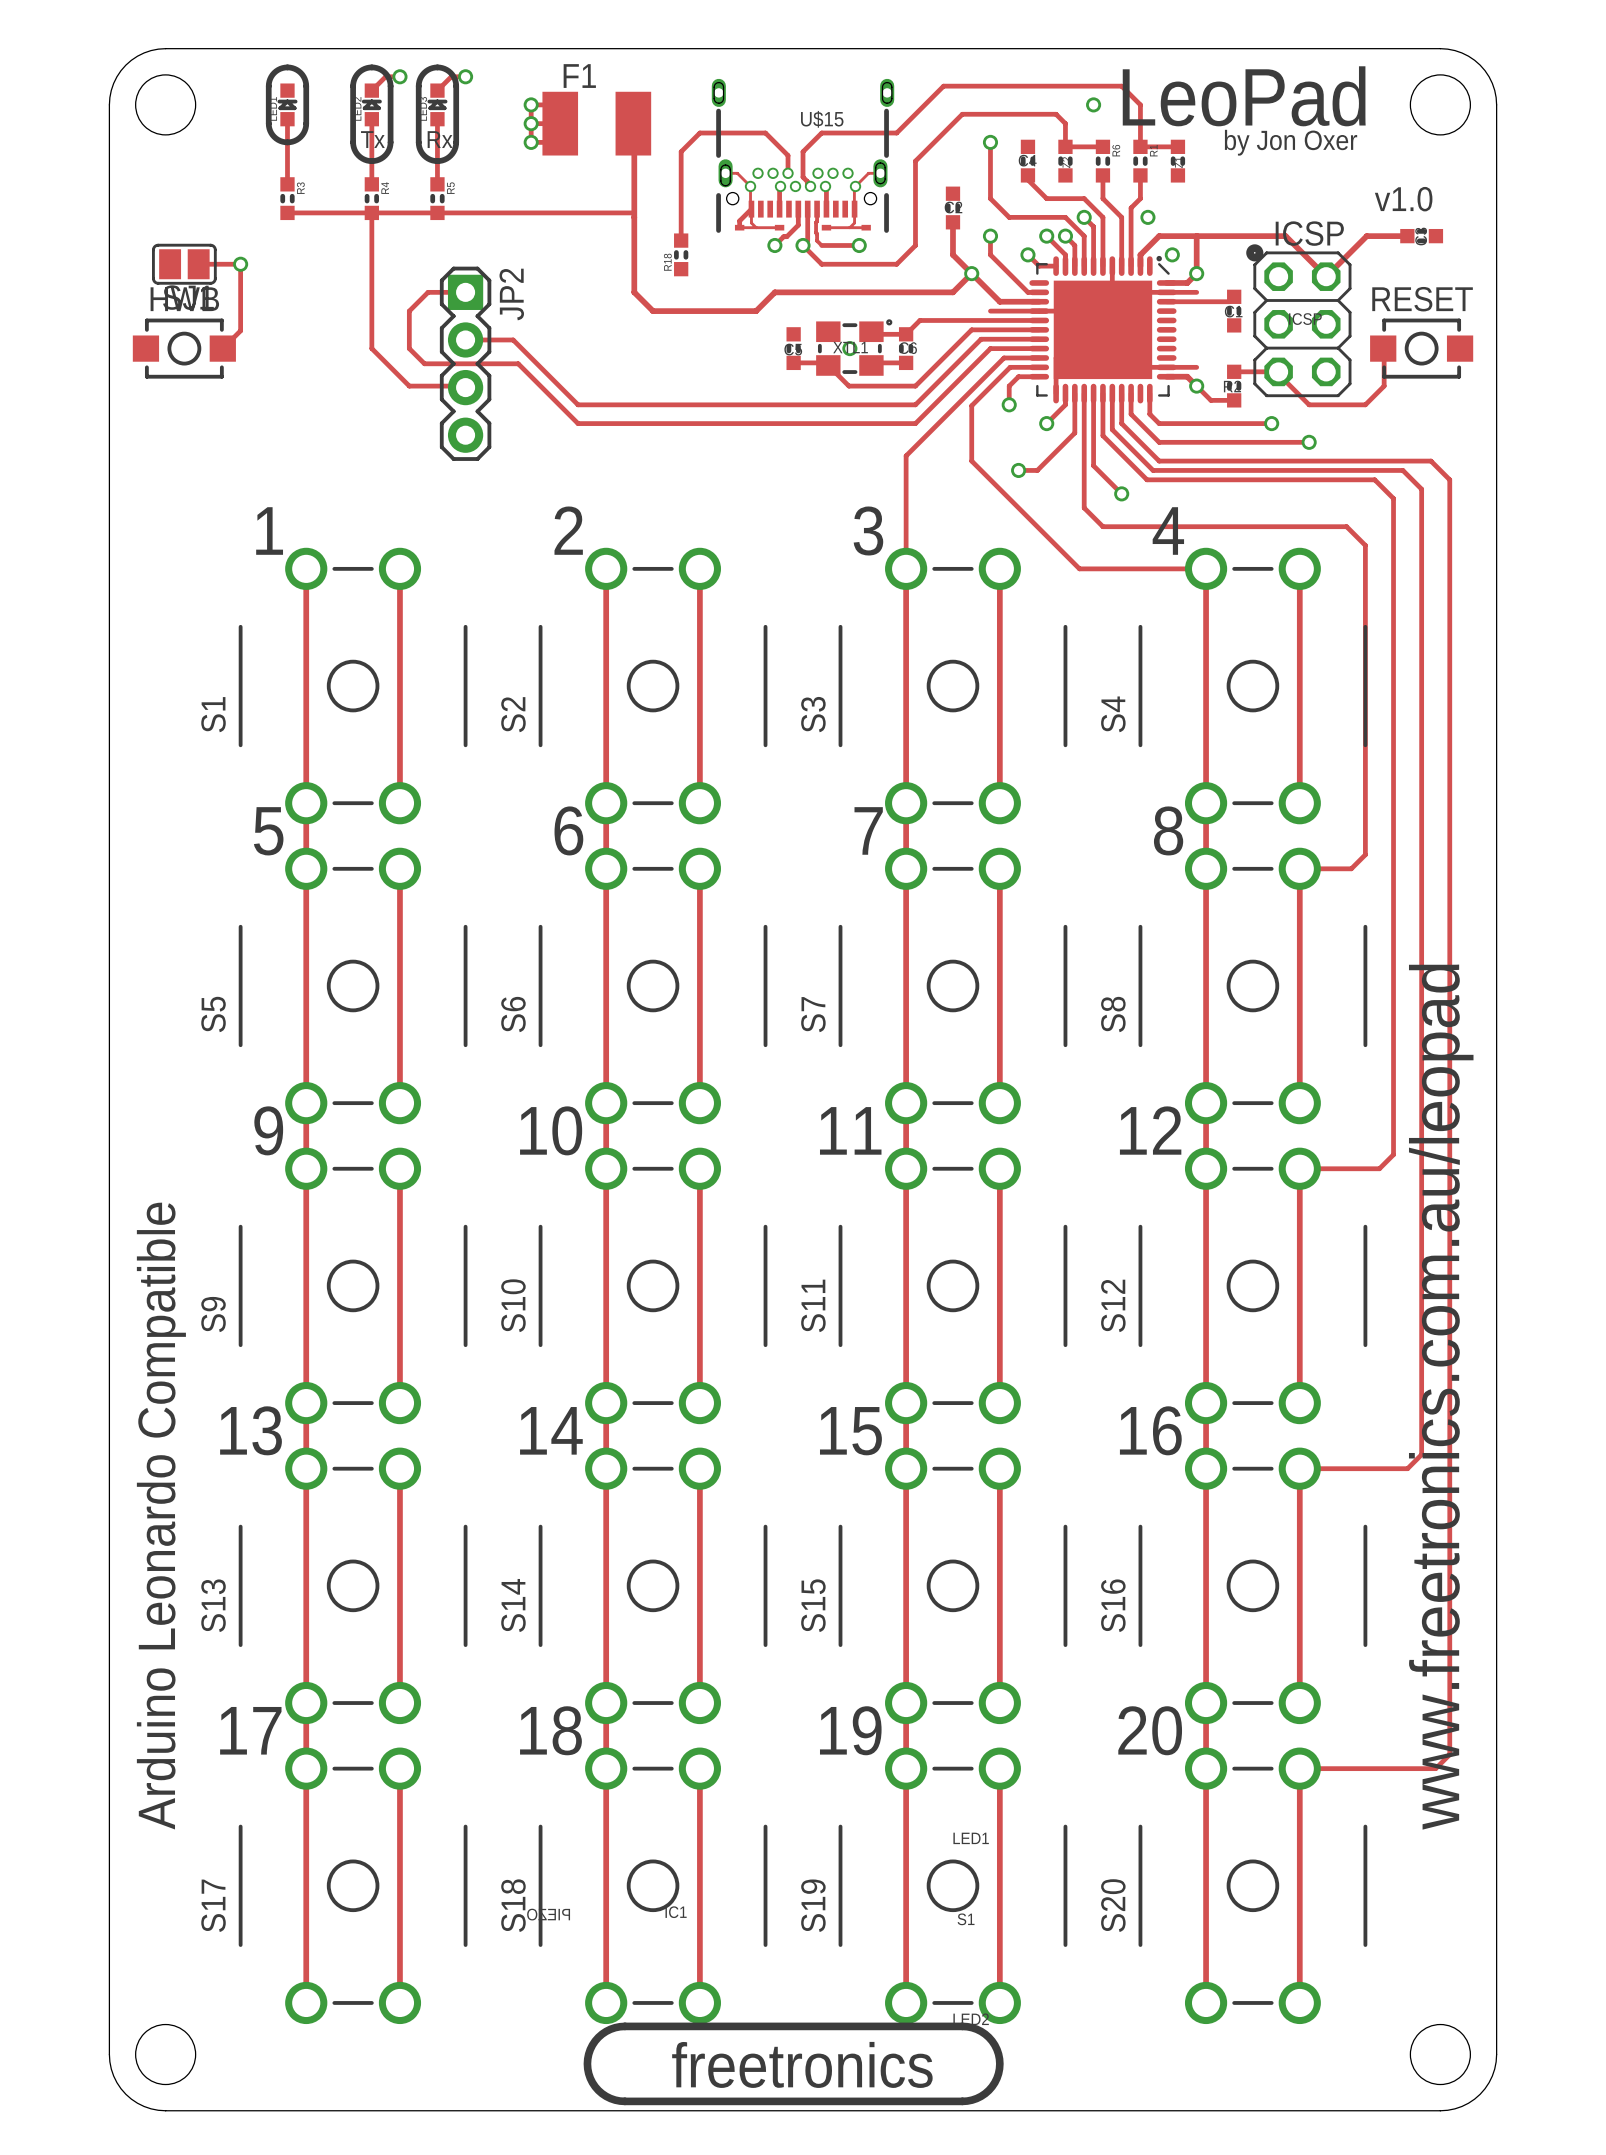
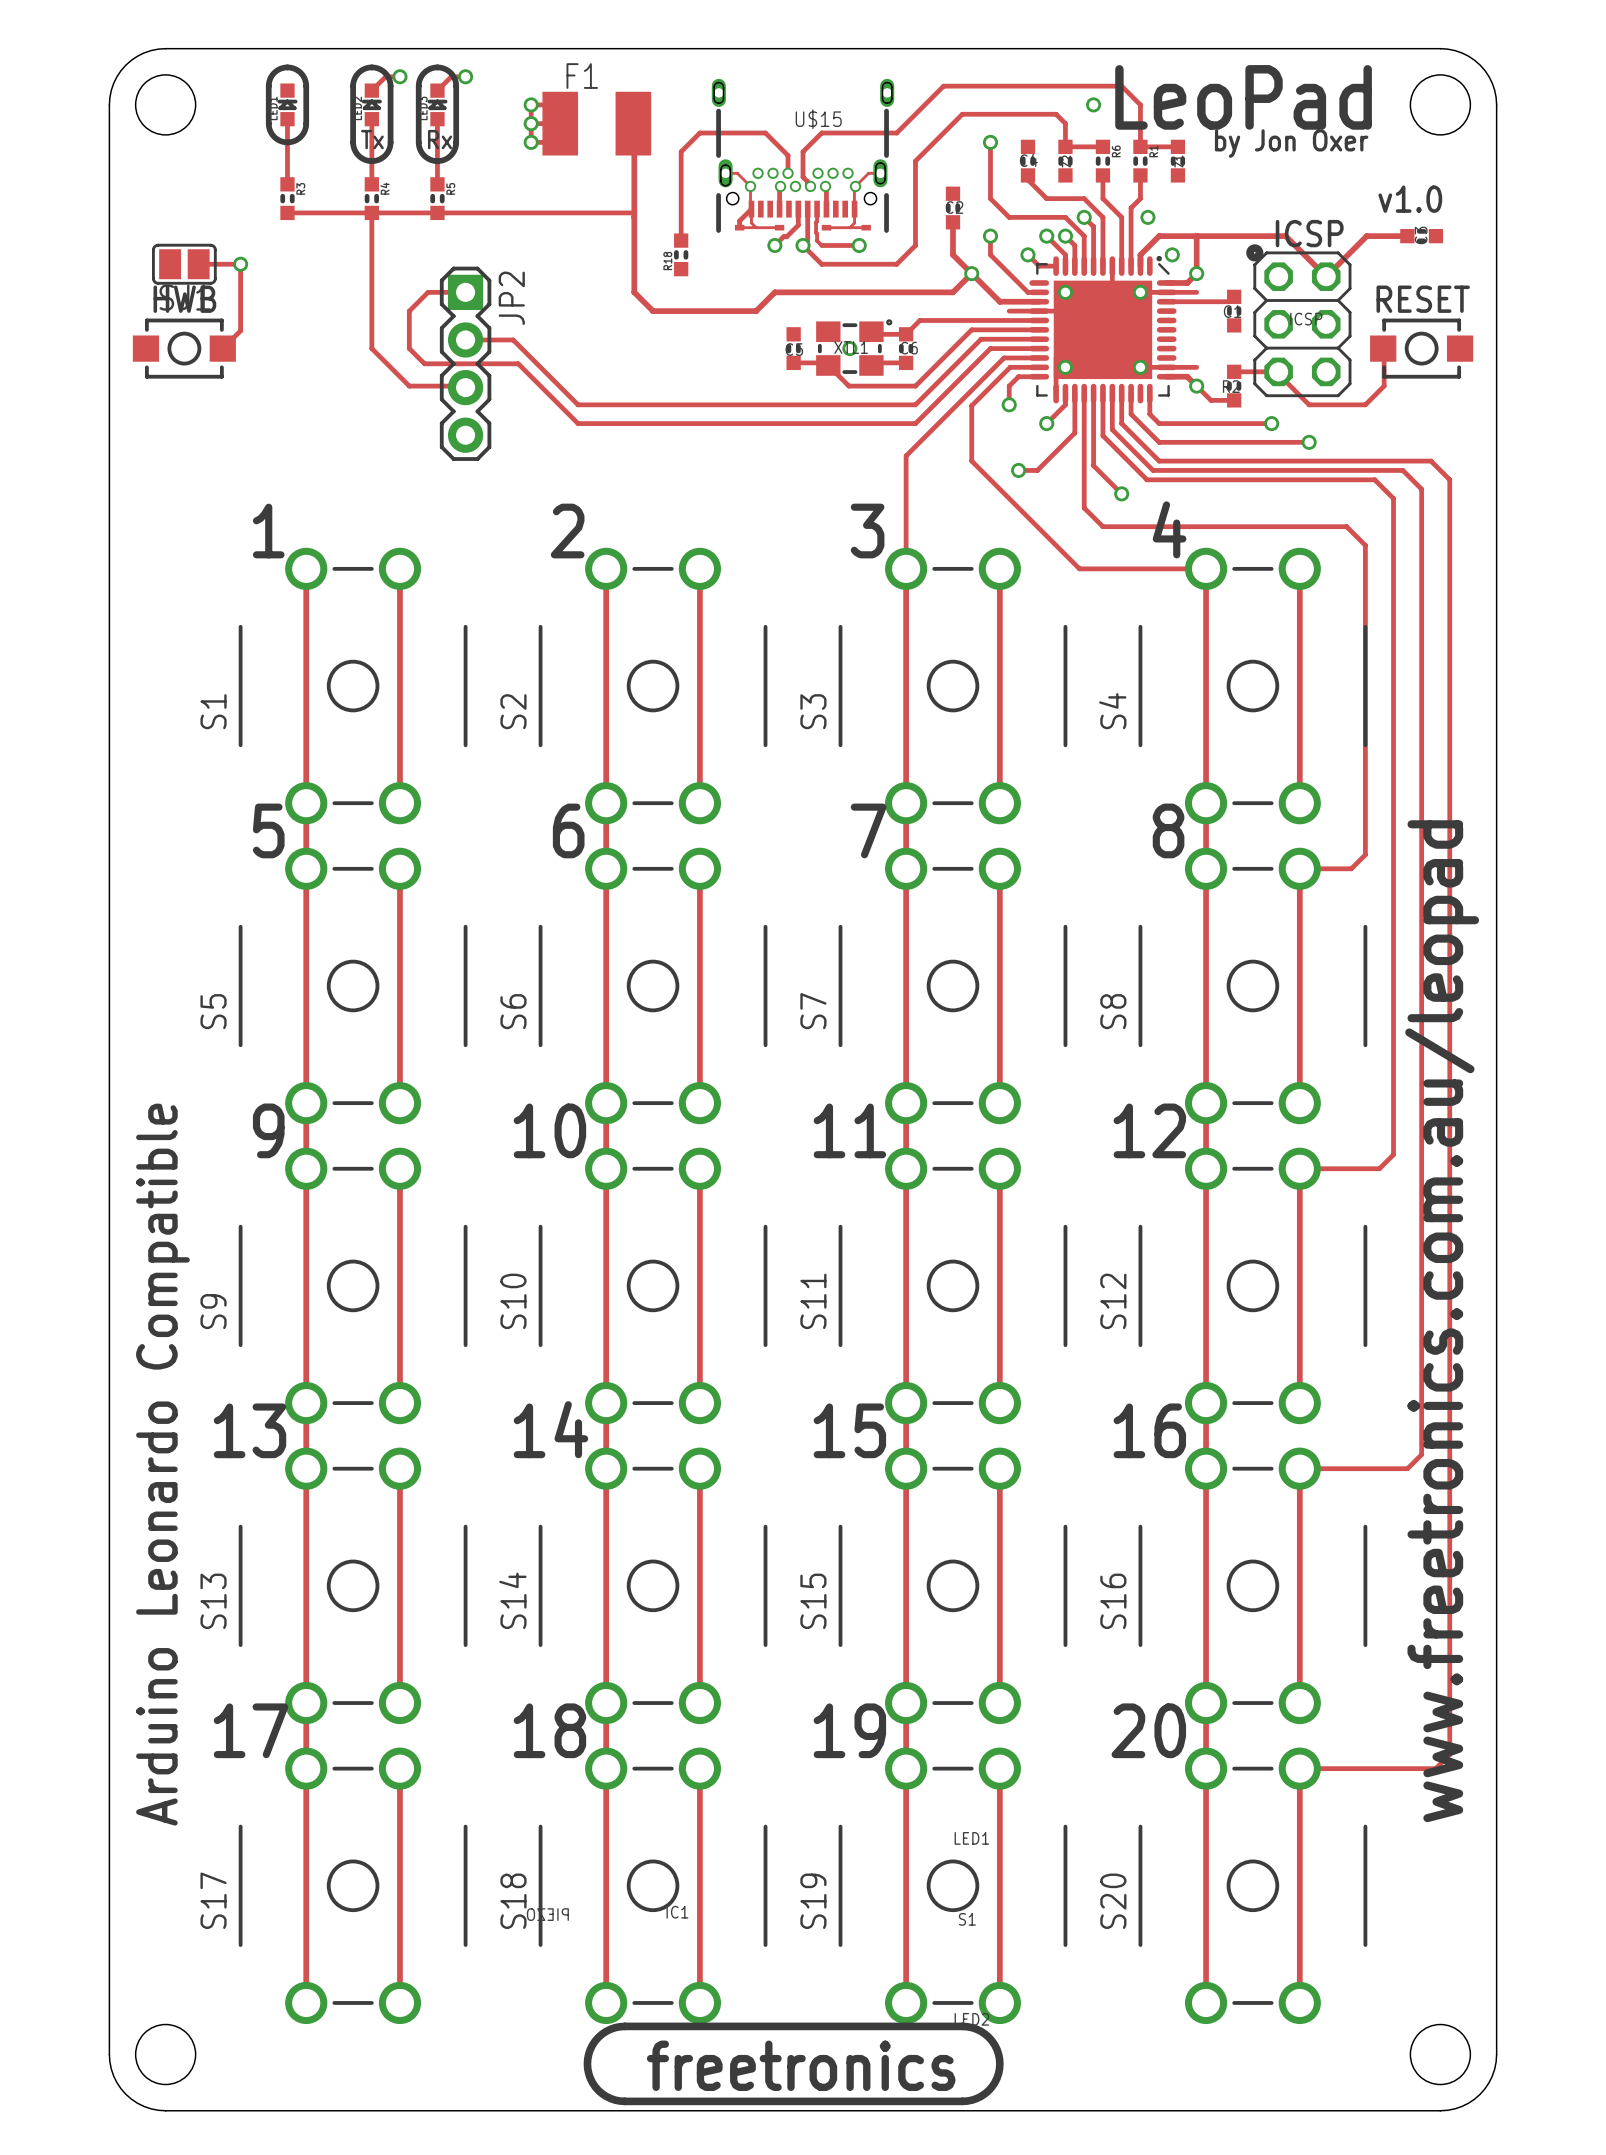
via: none -> (1065, 292)
via: none -> (1140, 292)
track: (990, 311) (1009, 311) -> none
via: none -> (1065, 367)
via: none -> (1140, 367)

